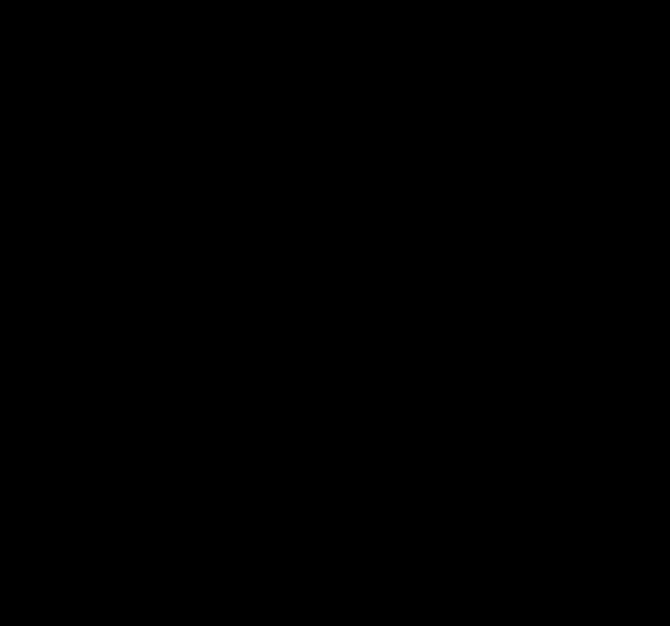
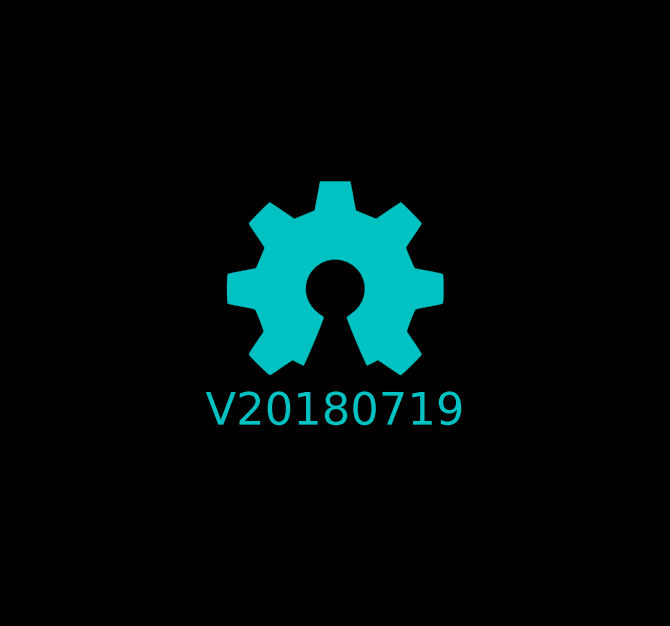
drawing: none -> [226, 181, 444, 376]

